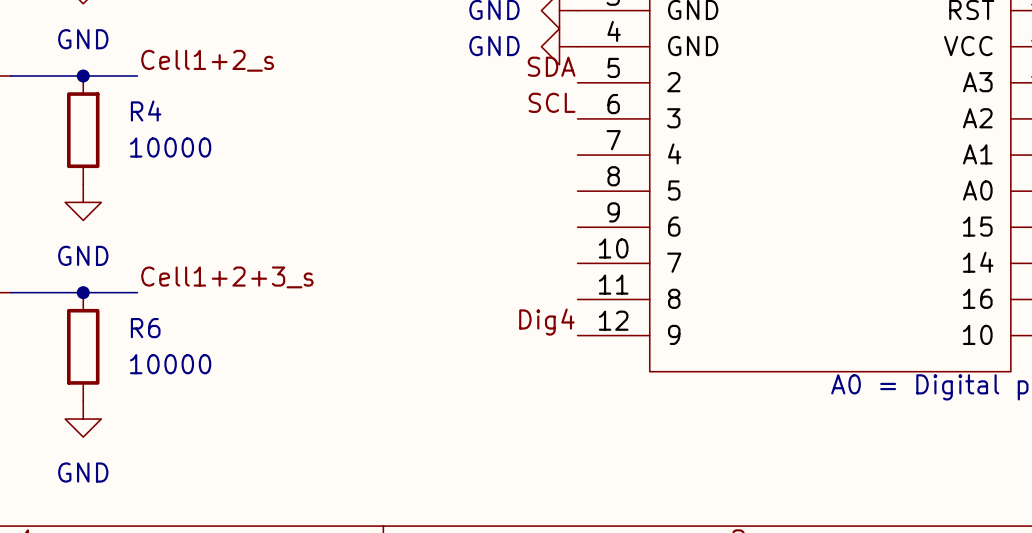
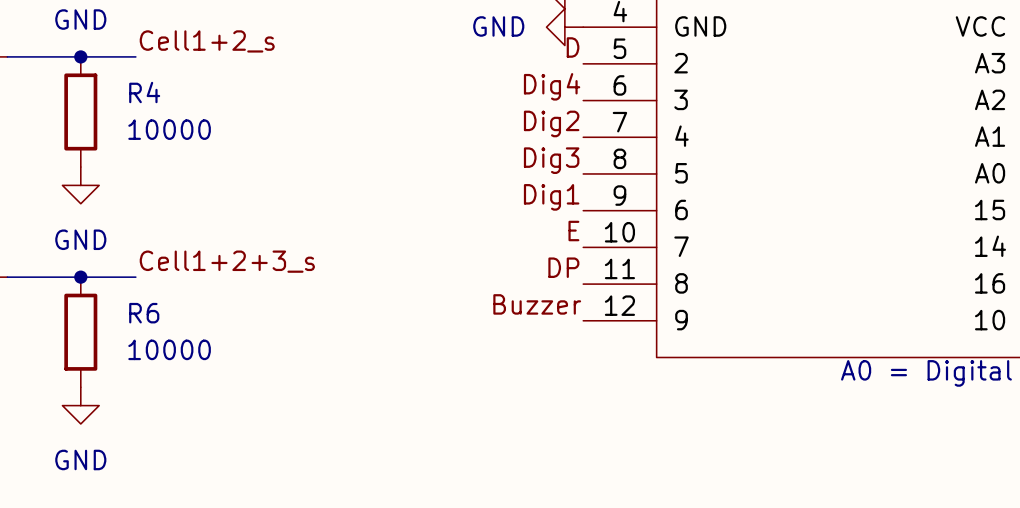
label: SDA (551, 66) -> D (573, 47)
label: SCL (552, 102) -> Dig4 (552, 86)
label: none -> Dig2 (551, 123)
label: none -> Dig3 (551, 160)
label: none -> Dig1 (551, 197)
label: none -> E (573, 231)
label: none -> DP (563, 267)
label: Dig4 (546, 322) -> Buzzer (537, 304)

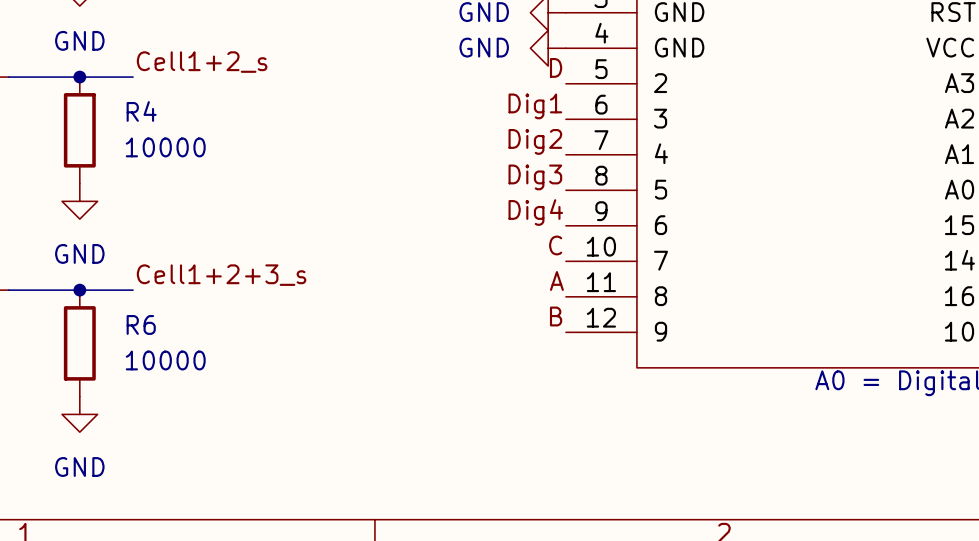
label: Dig4 (552, 86) -> Dig1 (535, 106)
label: Dig1 (551, 197) -> Dig4 (535, 212)
label: E (573, 231) -> C (555, 245)
label: DP (563, 267) -> A (556, 280)
label: Buzzer (537, 304) -> B (556, 316)

